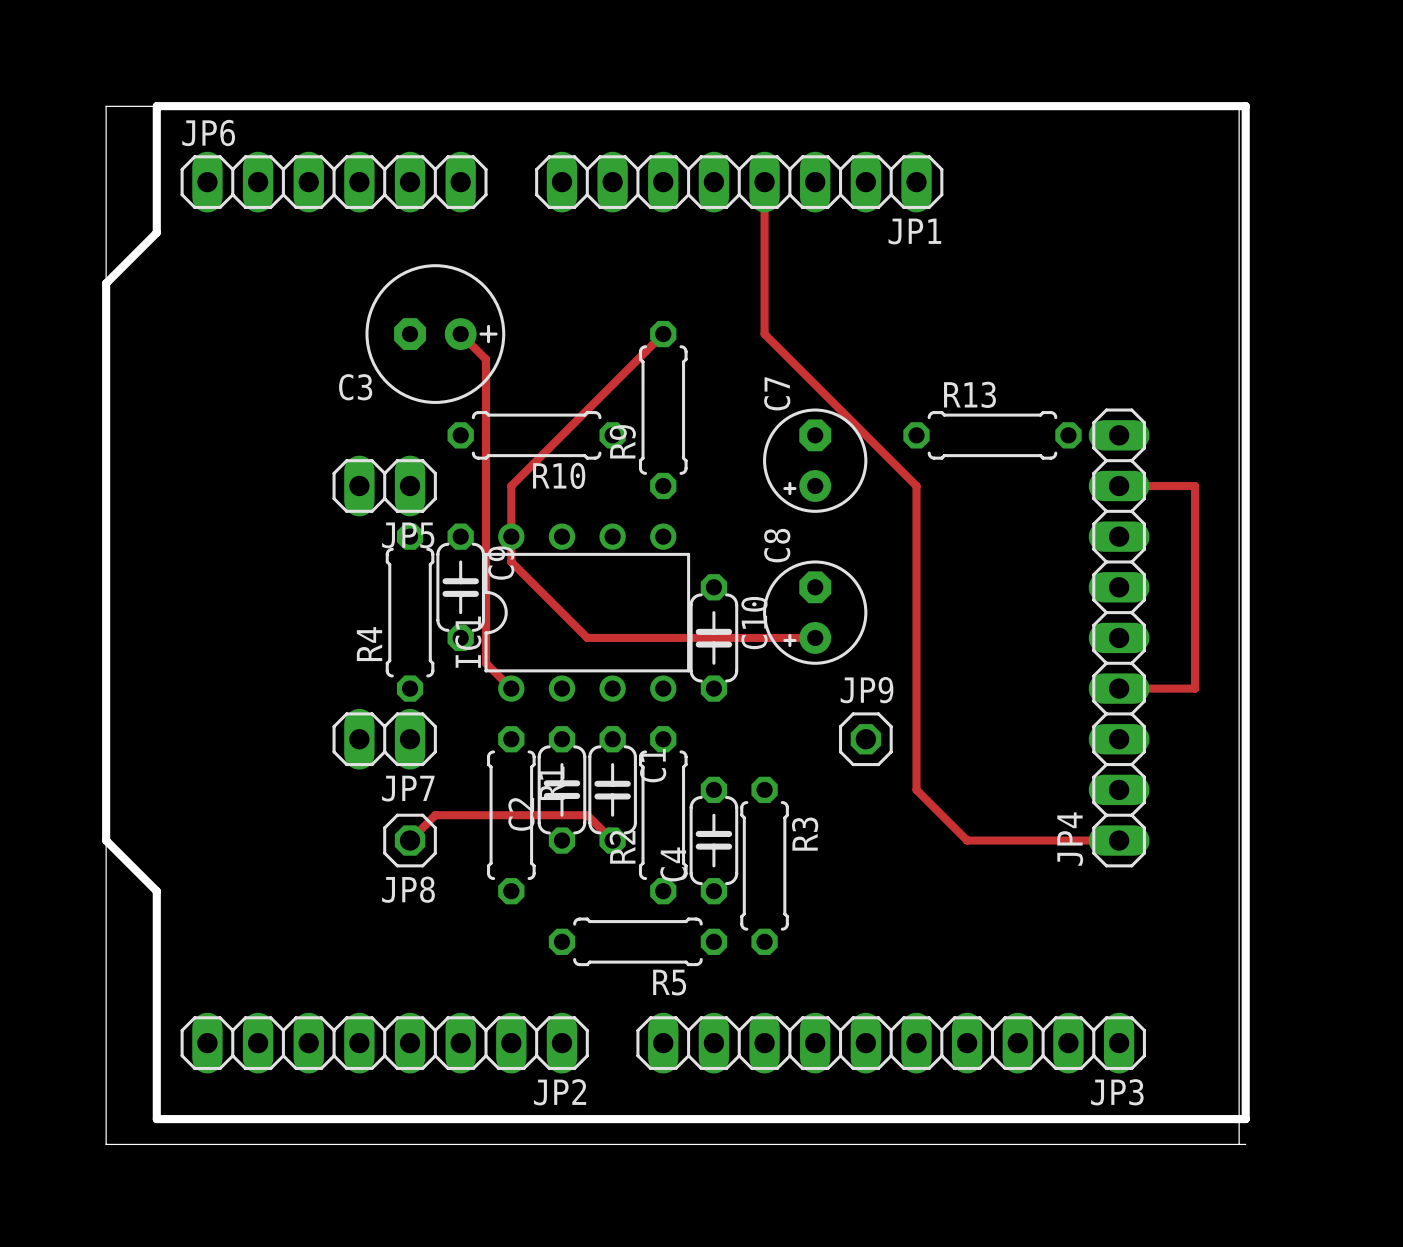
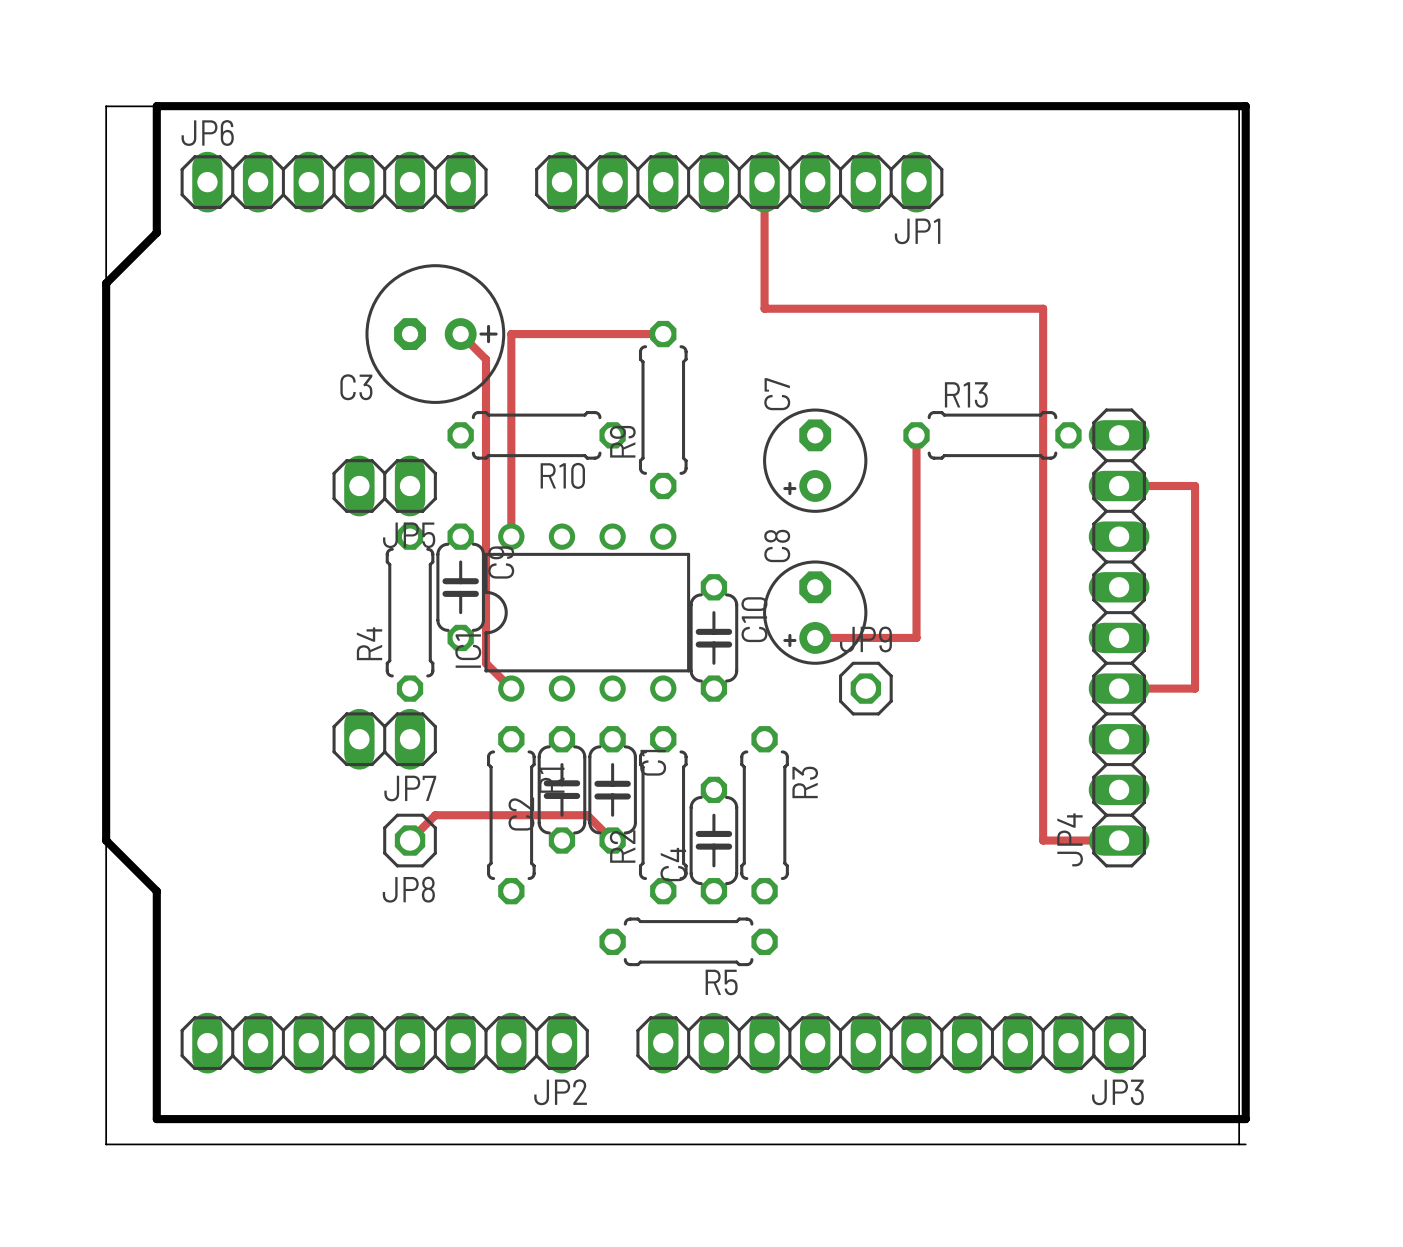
track: (764, 308) (764, 334) (916, 486) -> (916, 435) (916, 486)
track: none -> (764, 308) (1043, 308) (1043, 840)
track: (663, 334) (511, 486) -> (663, 334) (511, 334) (511, 486)
track: (511, 536) (511, 561) (587, 637) (815, 637) -> none
track: (916, 637) (916, 789) (967, 840) (1043, 840) -> (916, 637) (815, 637)
JP9 position: (865, 739) -> (865, 688)
R3 position: (764, 865) -> (764, 815)
R5 position: (637, 941) -> (688, 941)

